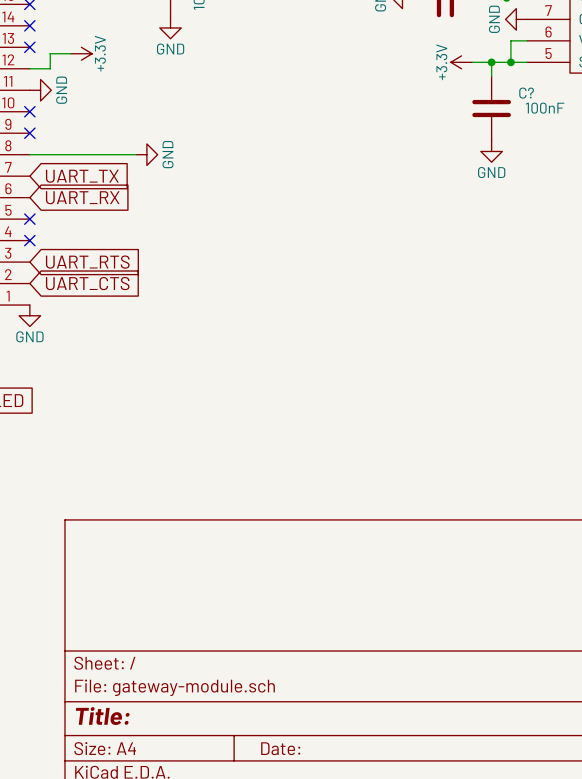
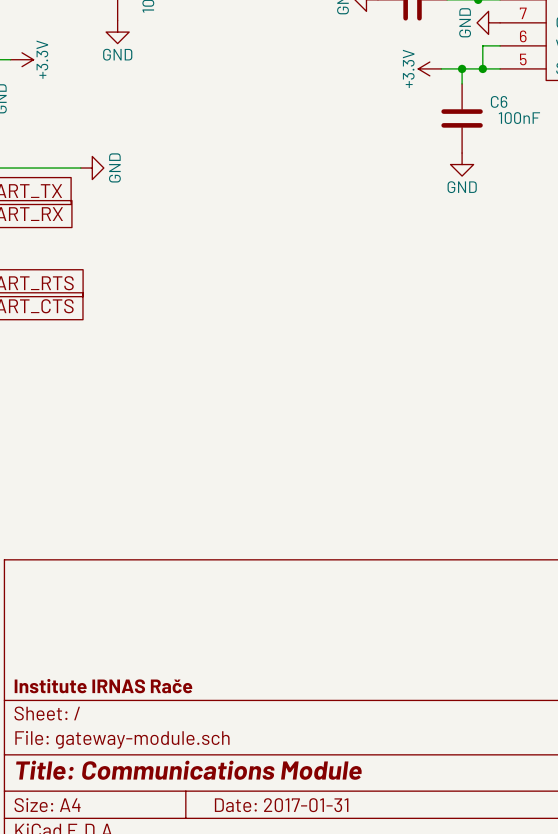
C? name: C? (526, 93) -> C6 (499, 101)
title block: none -> Institute IRNAS Rače (103, 686)
title block: Title: (102, 716) -> Title: Communications Module (188, 770)
title block: Date: (280, 748) -> Date: 2017-01-31 (281, 805)

